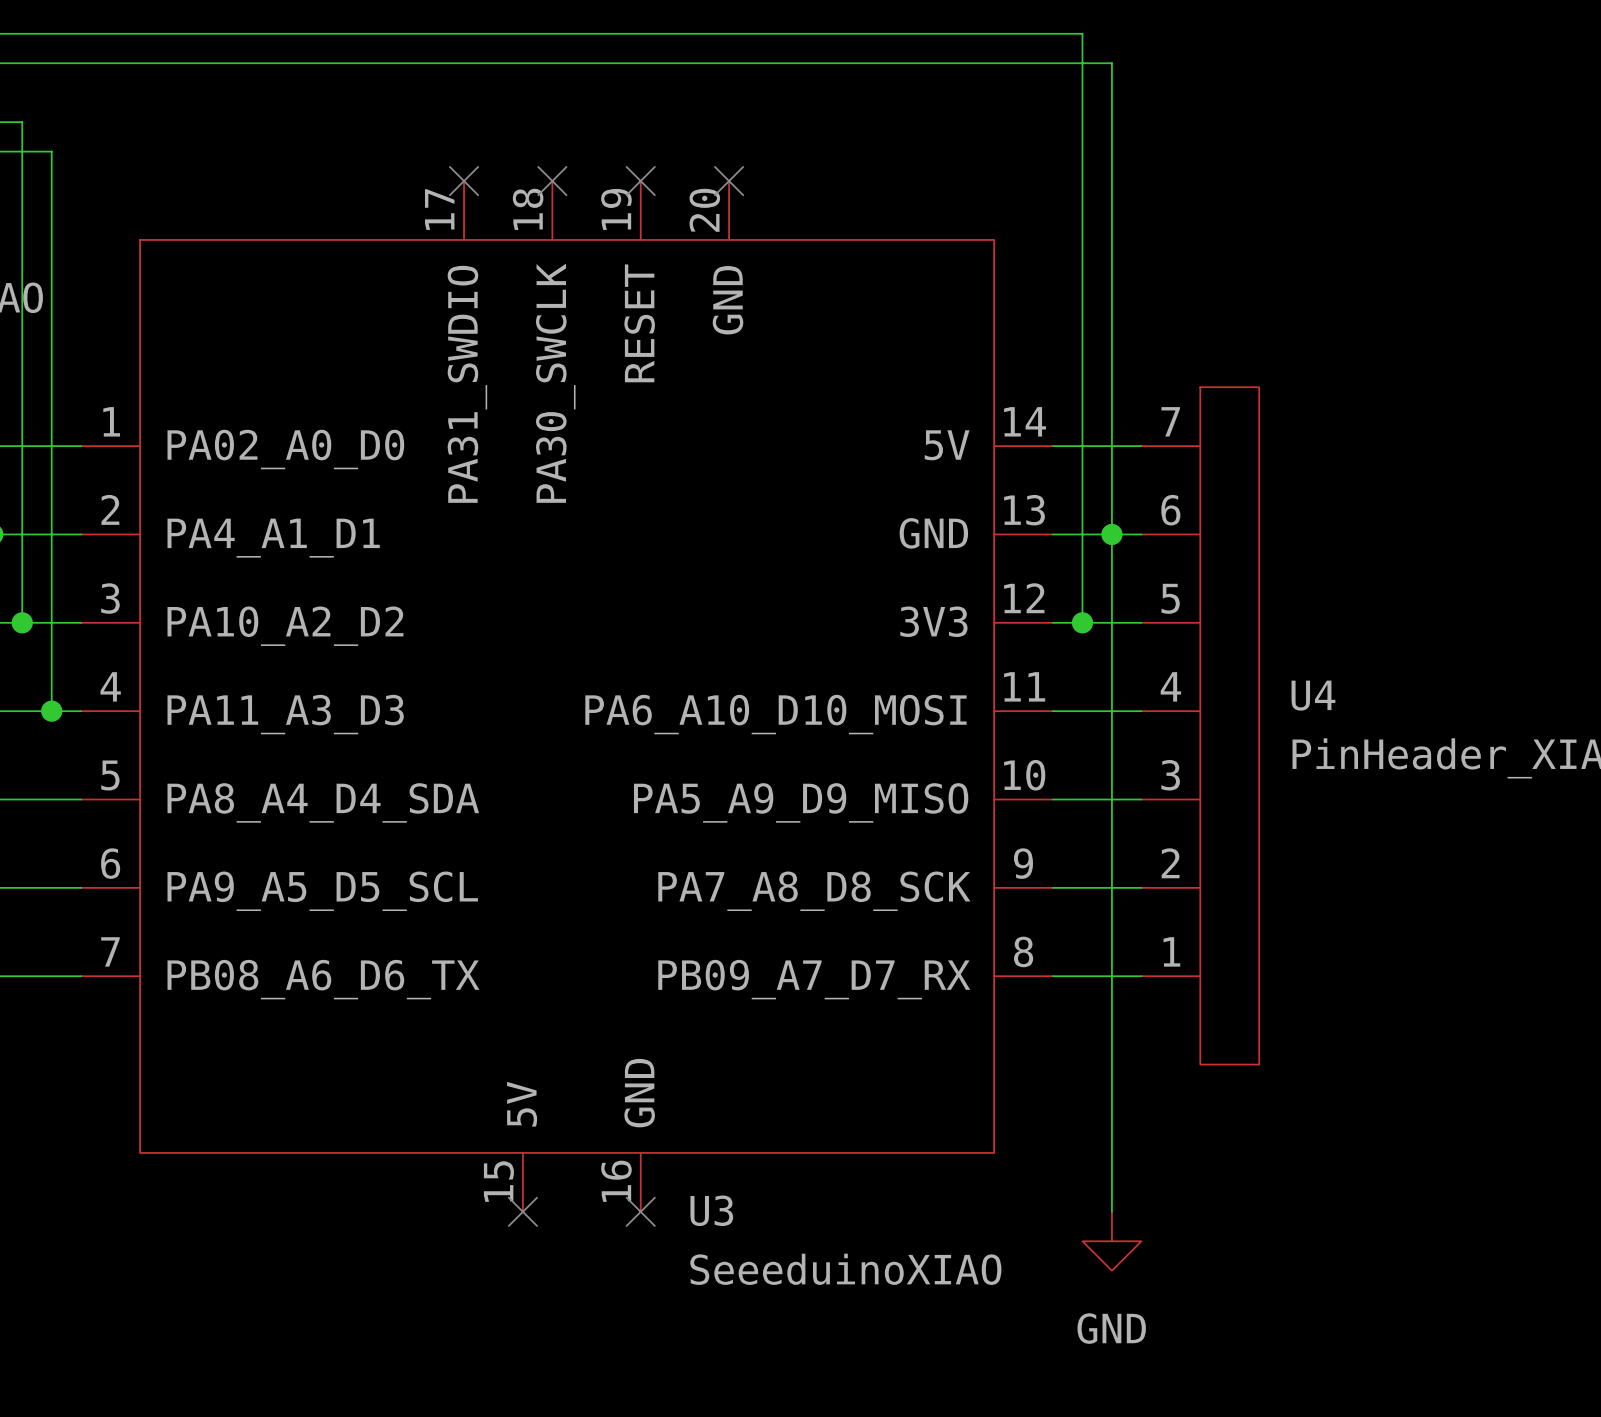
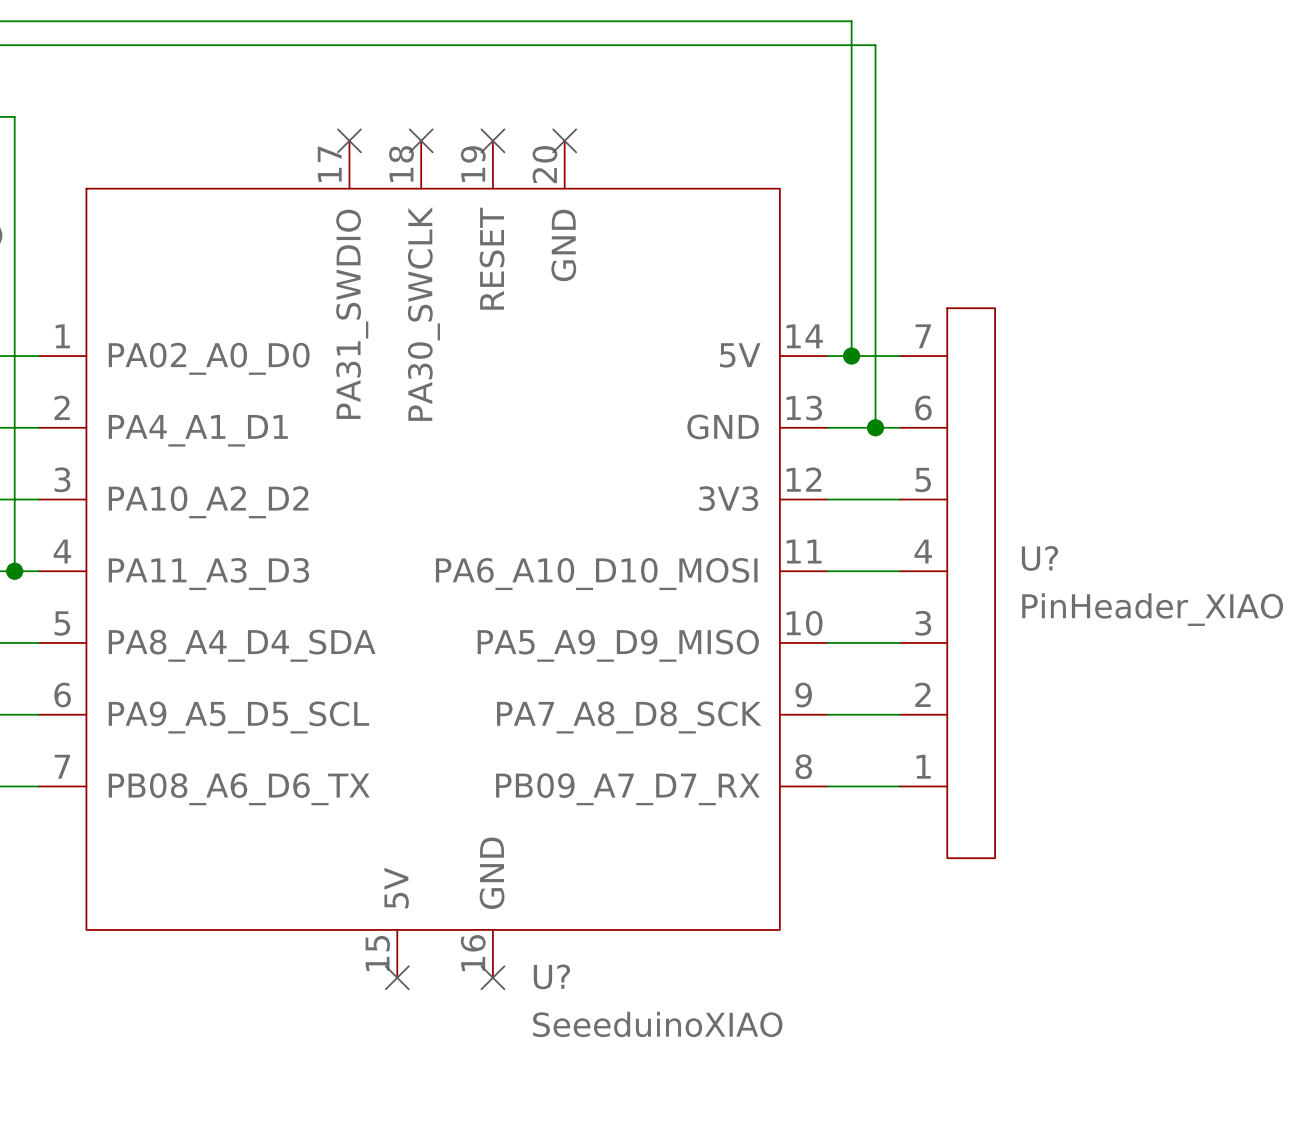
wire: (1082, 446) (1082, 622) -> none
junction: none -> (851, 356)
wire: (1111, 534) (1111, 1211) -> none
junction: (1082, 622) -> none
U4 name: U4 (1313, 695) -> U? (1039, 558)
U3 name: U3 (711, 1210) -> U? (551, 976)
power symbol: GND (1111, 1241) -> none

